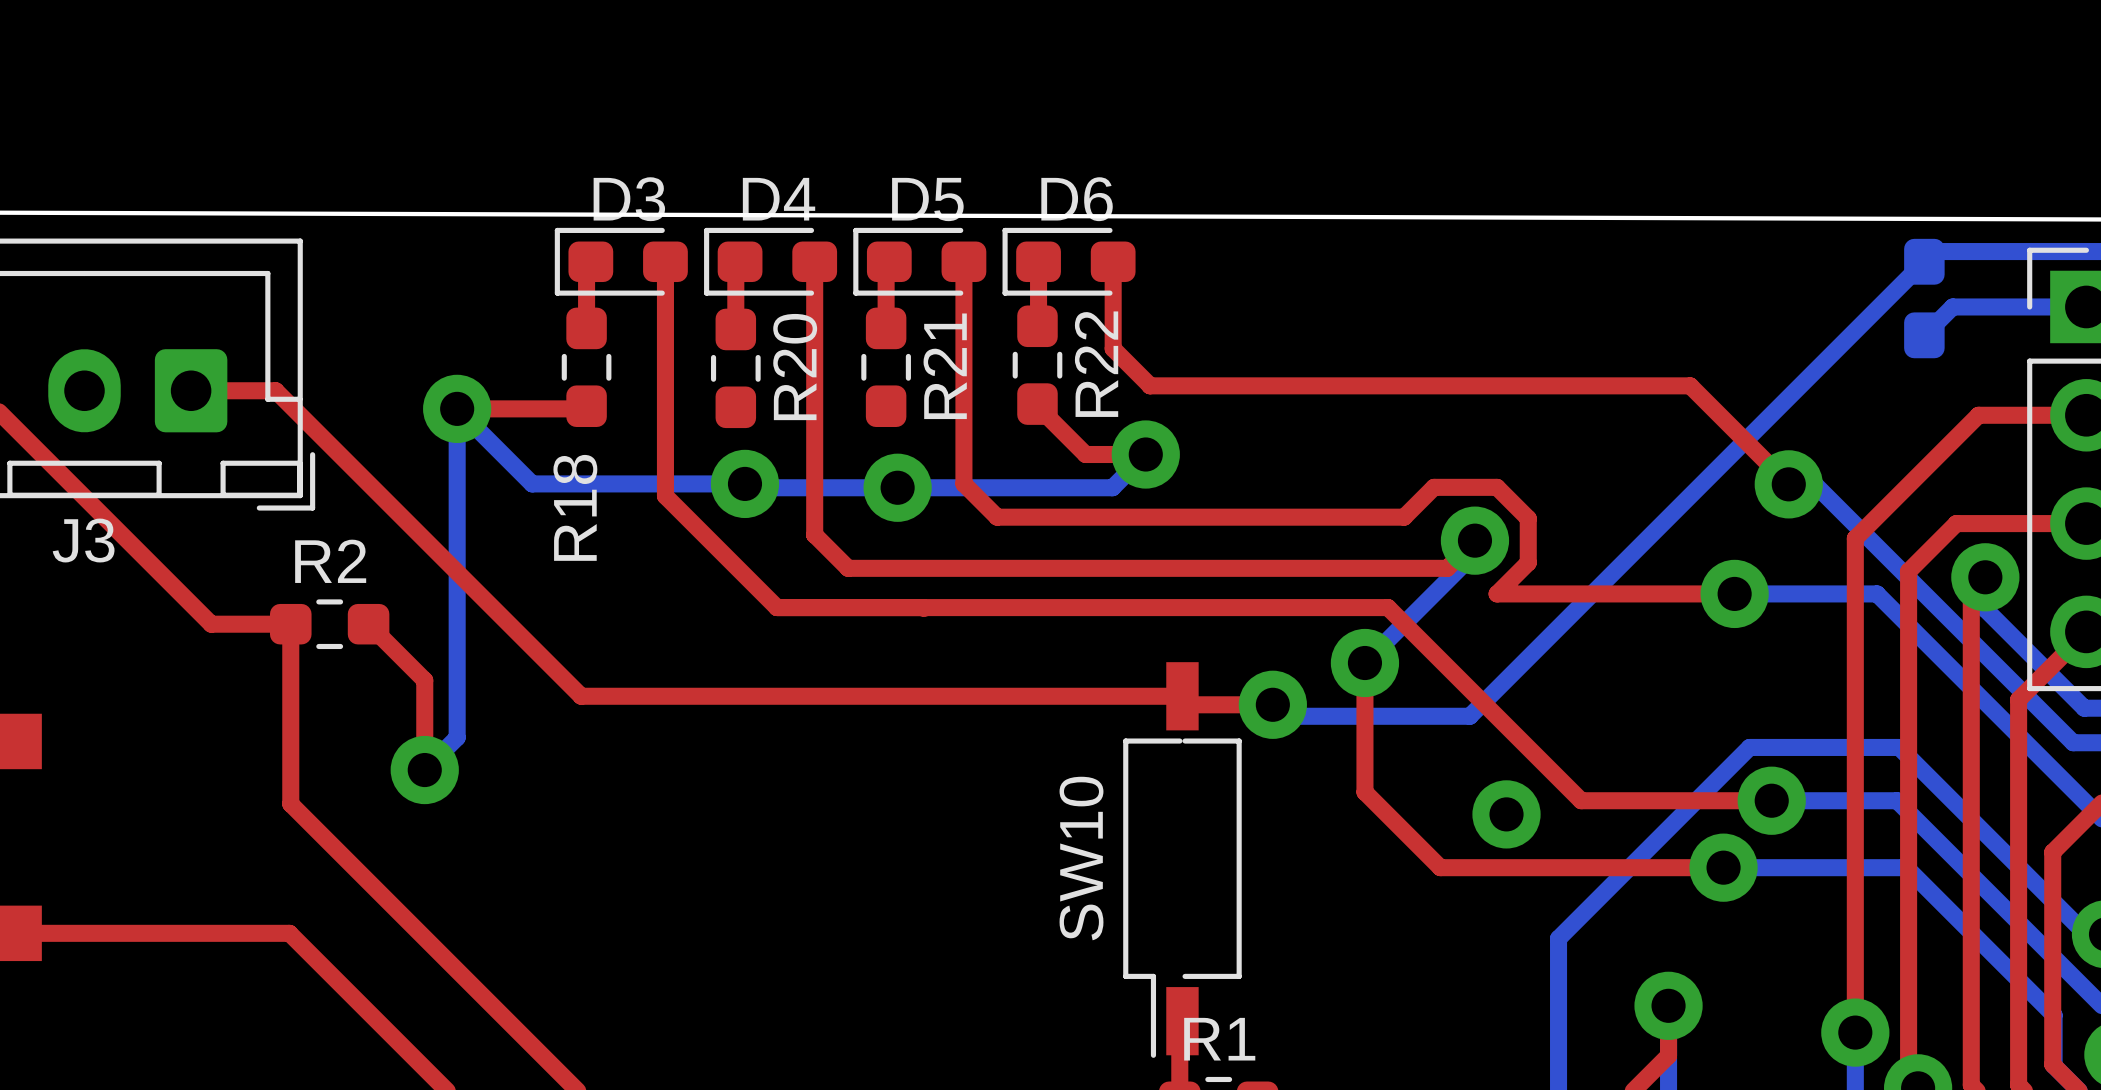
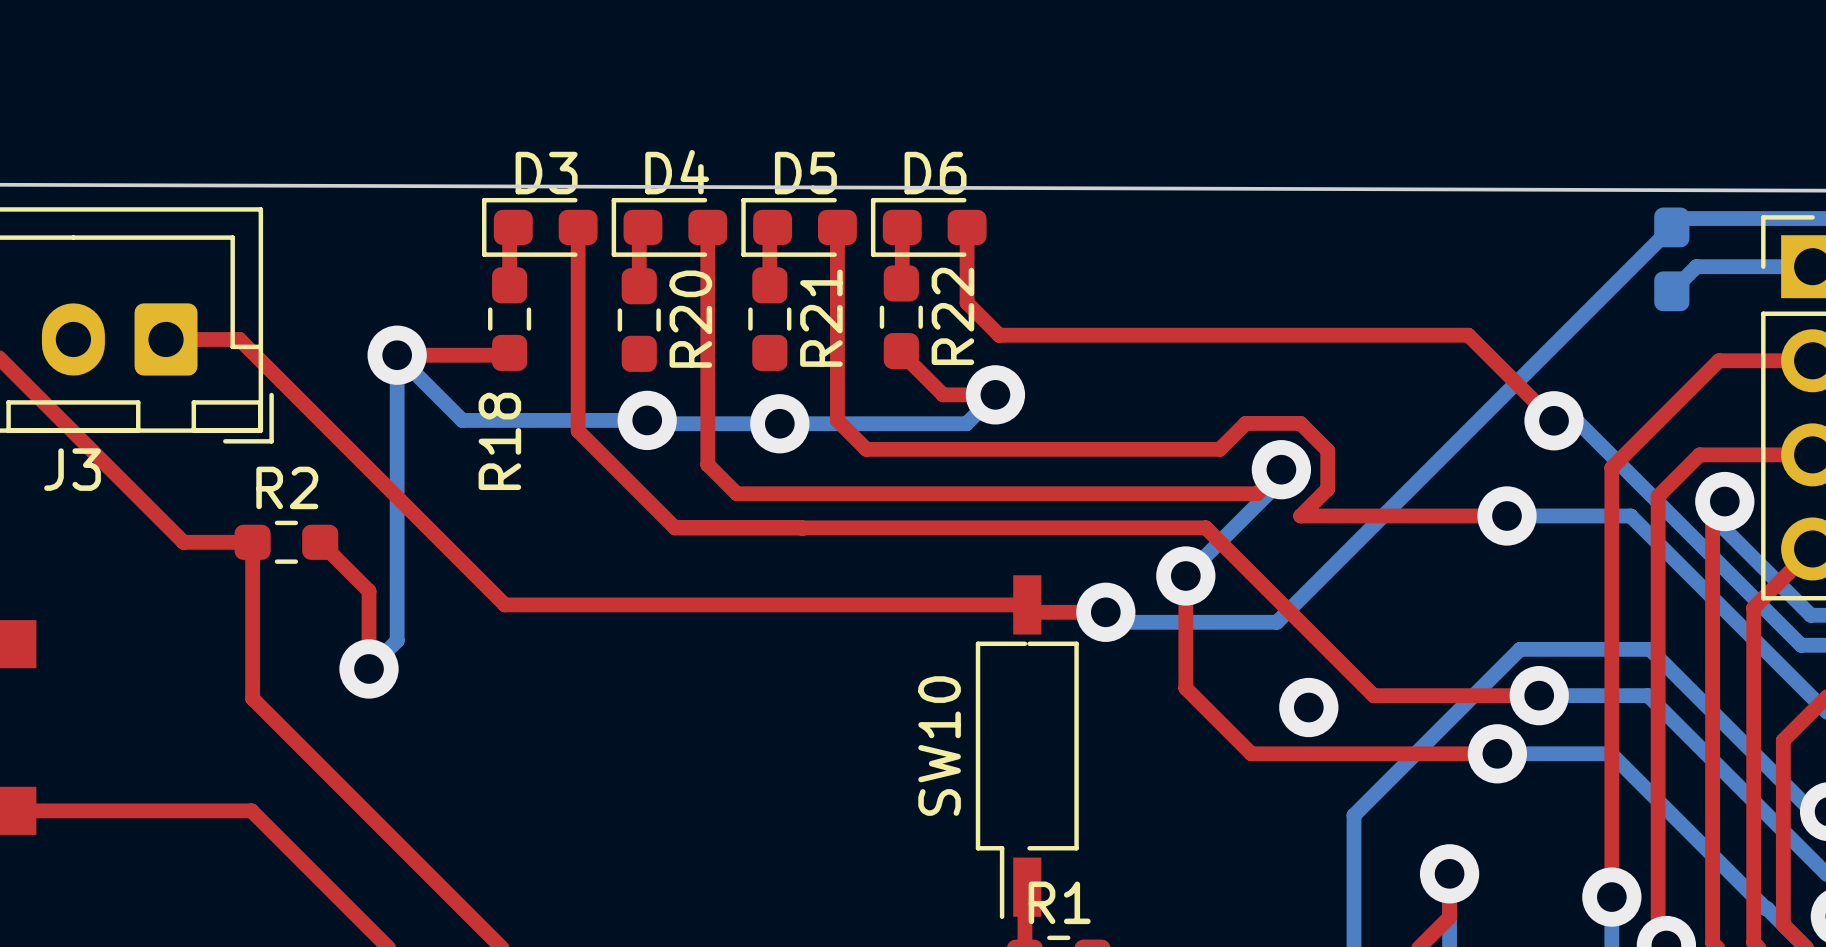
bottom track: (1854, 867) (1905, 866) (2054, 1015) (2054, 1065) -> (1611, 753) (1784, 926)

